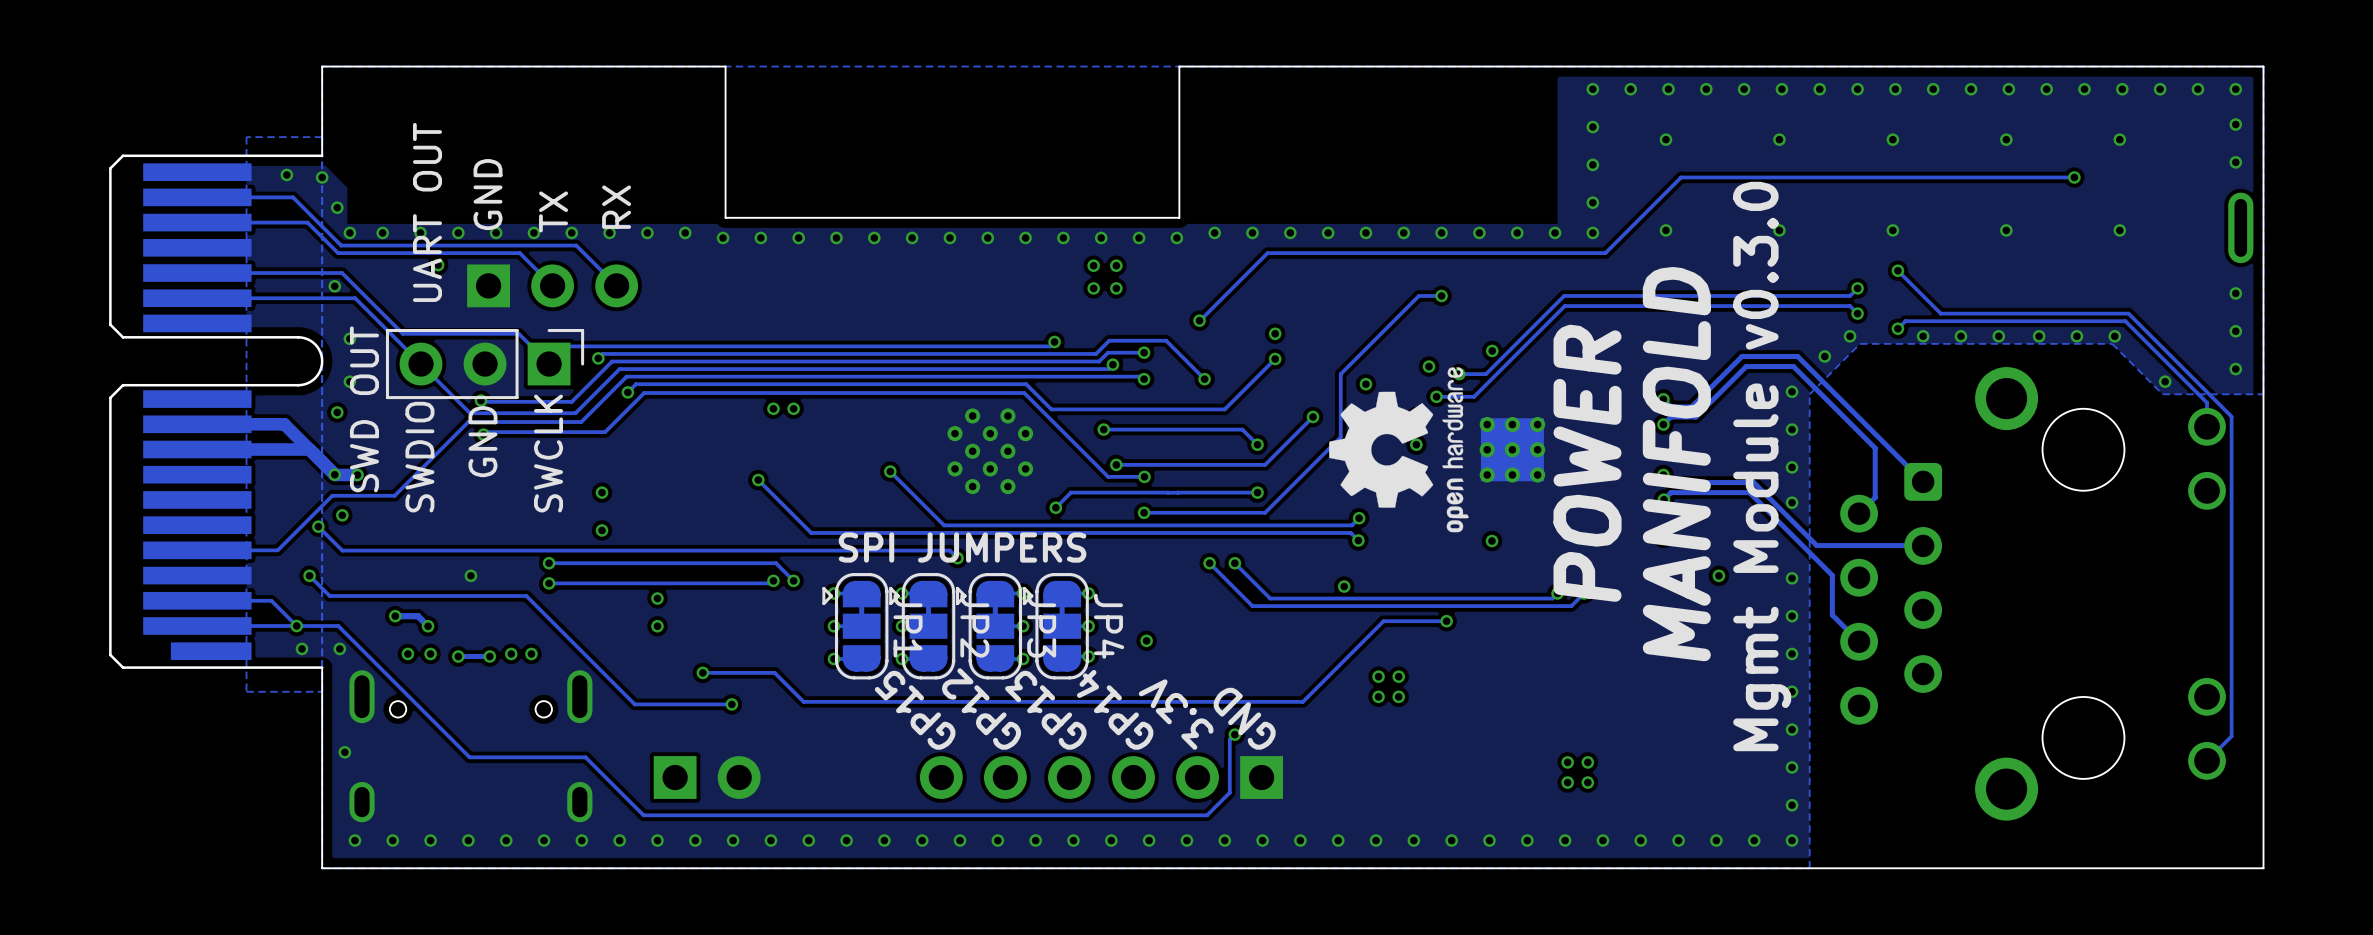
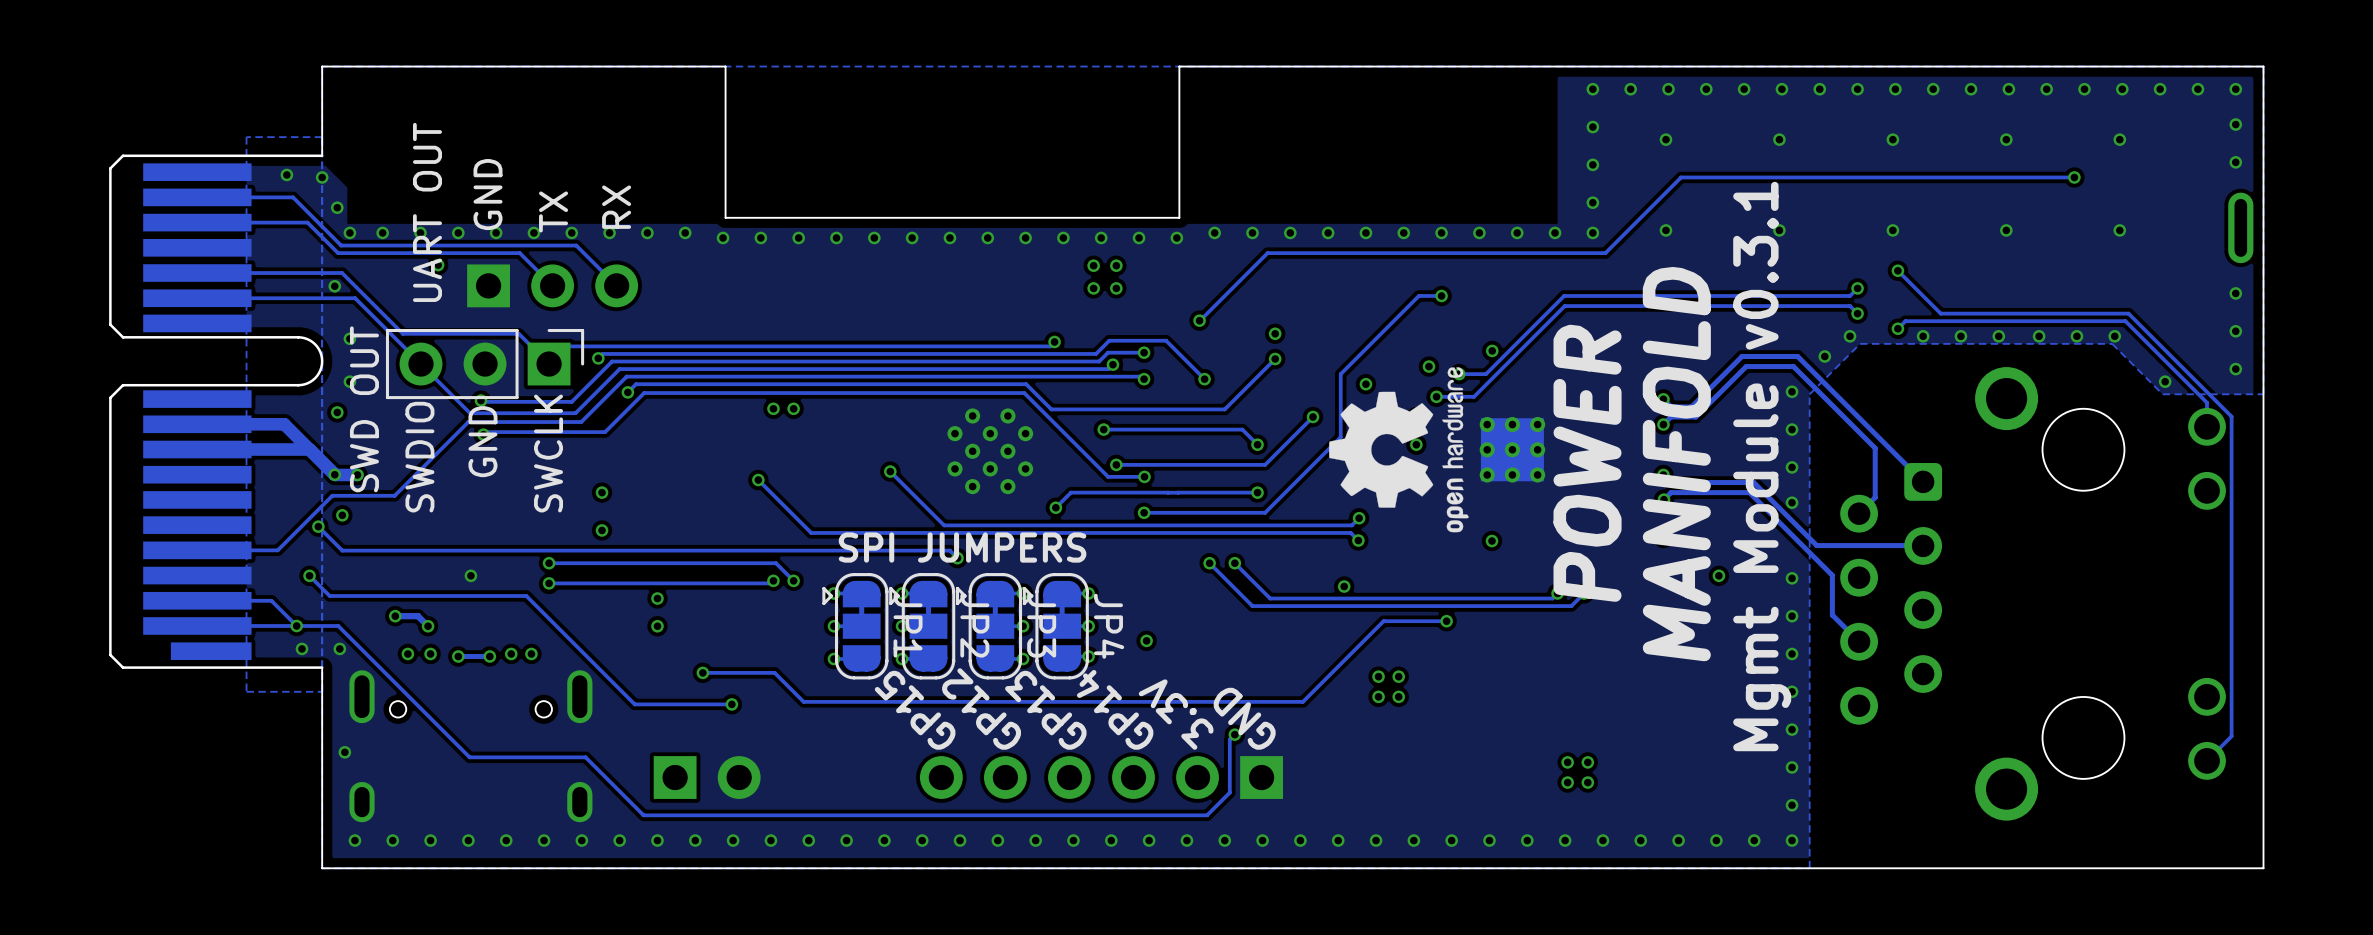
text: Mgmt Module v0.3.0 (1762, 466) -> Mgmt Module v0.3.1 (1762, 466)

